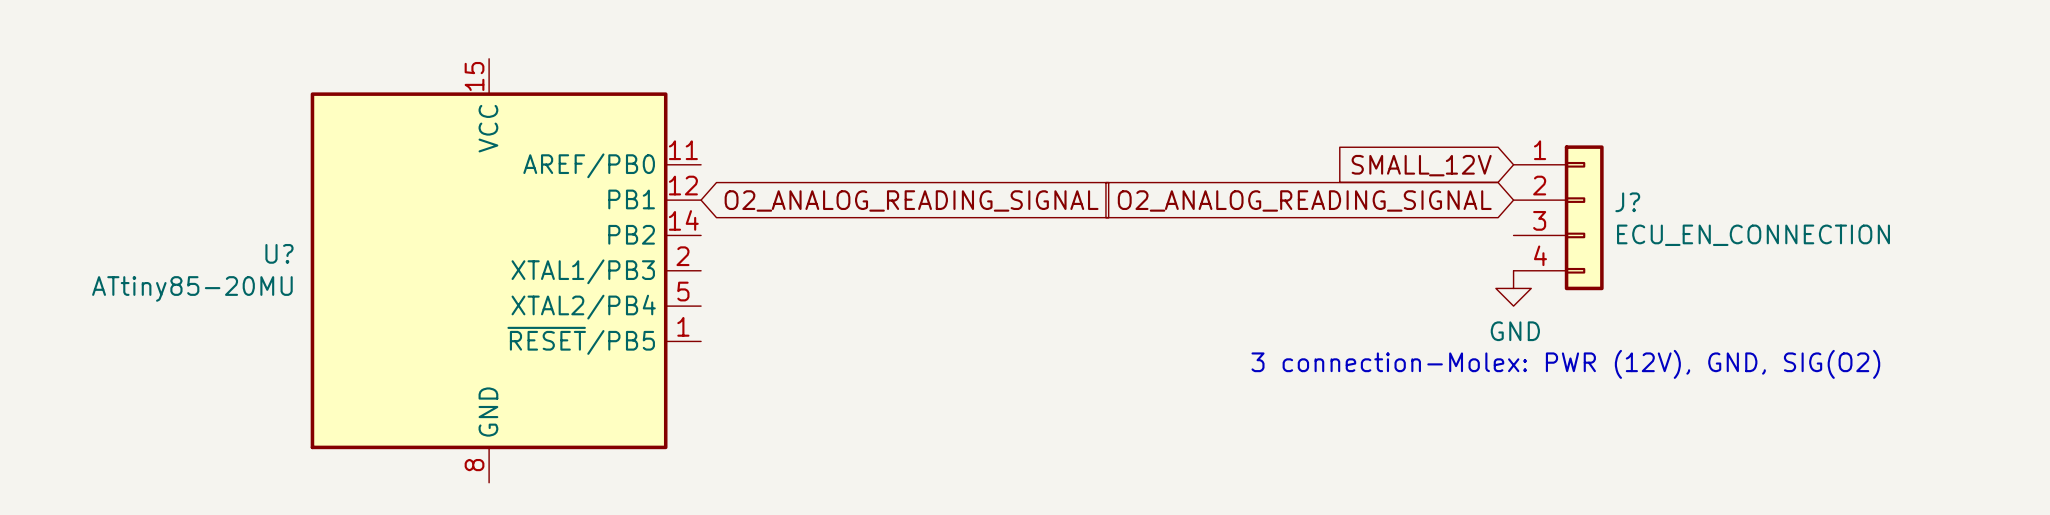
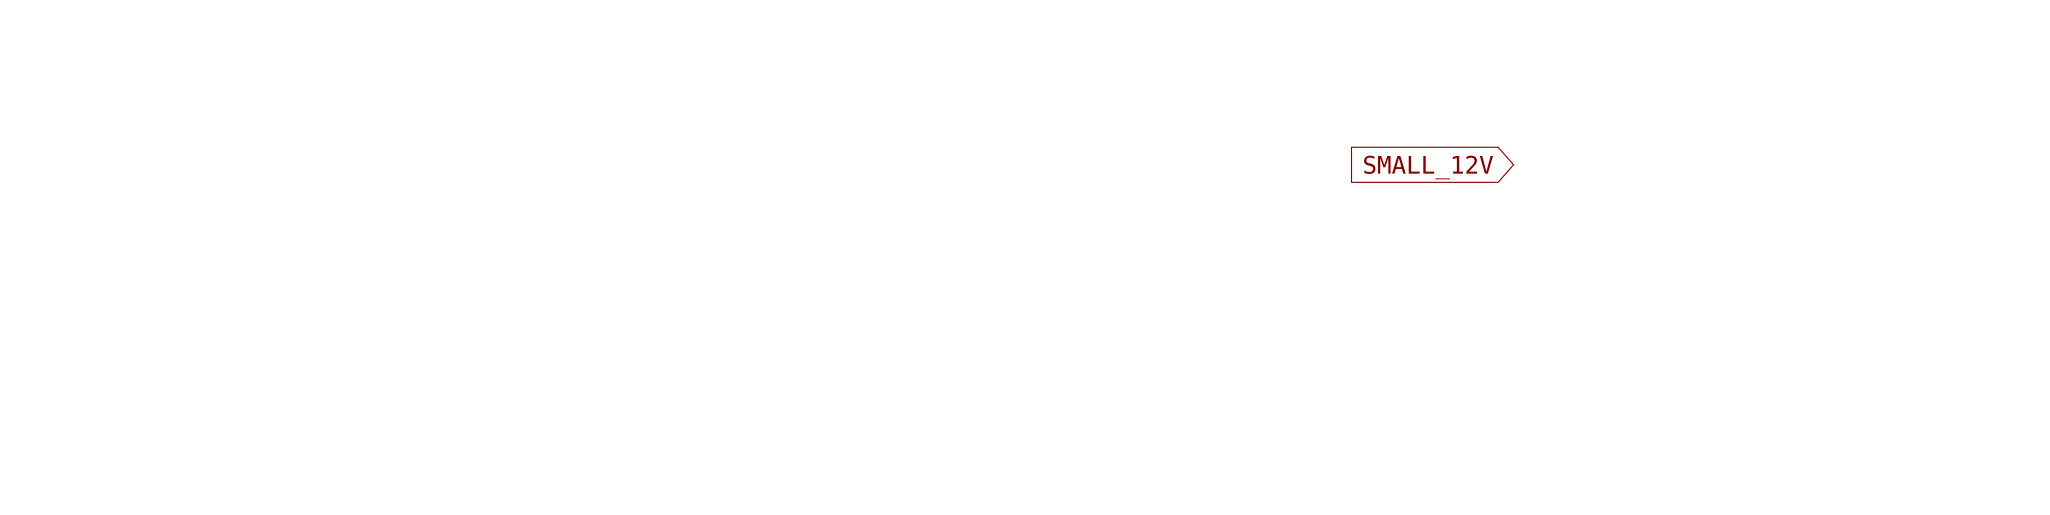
global label: O2_ANALOG_READING_SIGNAL (911, 200) -> none
global label: O2_ANALOG_READING_SIGNAL (1304, 200) -> none
J?: ECU_EN_CONNECTION (1558, 217) -> none
U?: ATtiny85-20MU (505, 270) -> none
power symbol: GND (1513, 288) -> none
text: 3 connection-Molex: PWR (12V), GND, SIG(O2) (1565, 364) -> none

